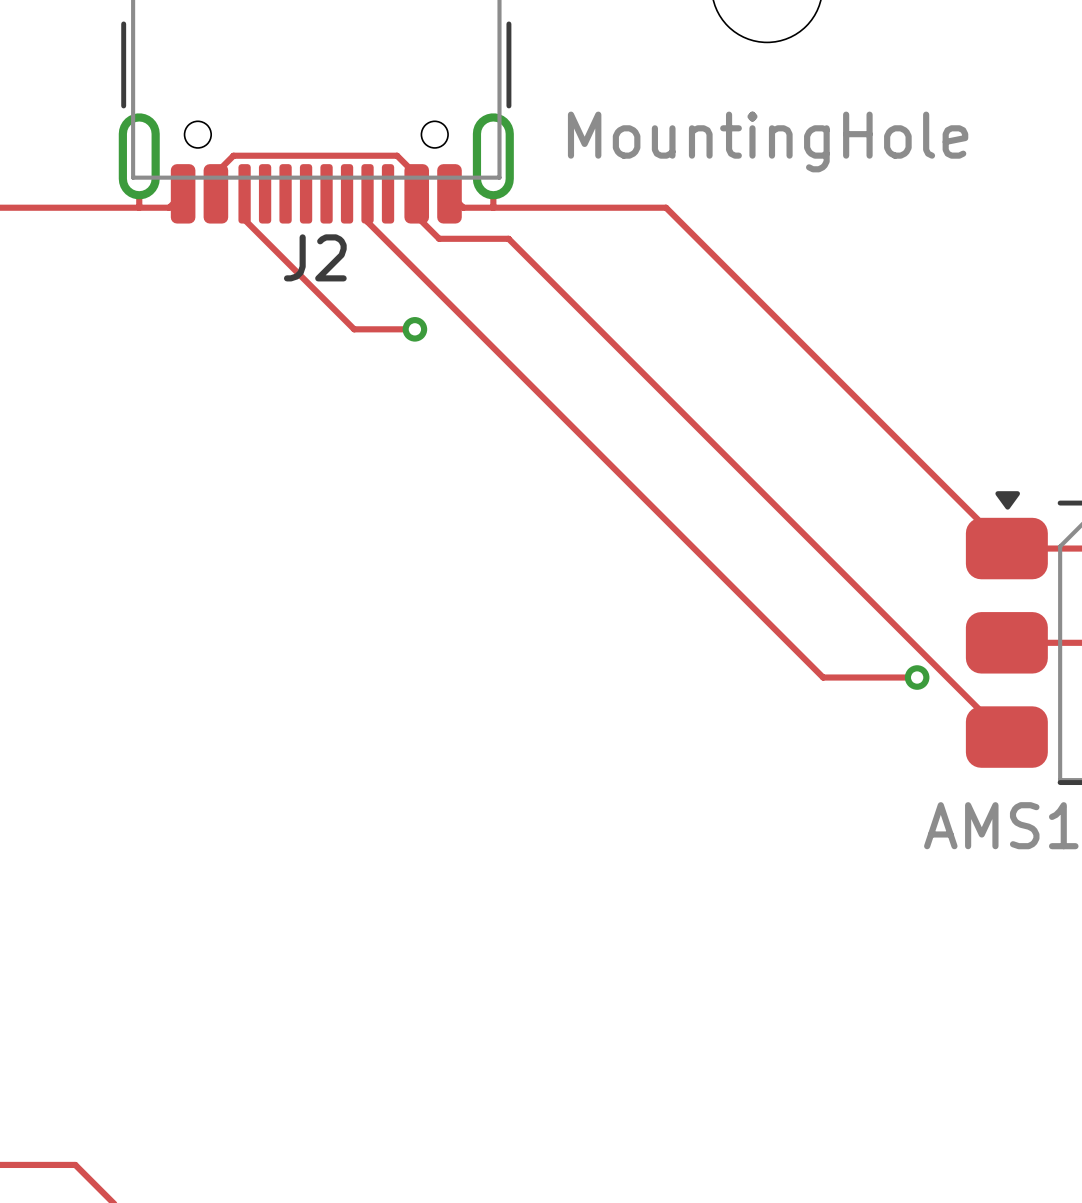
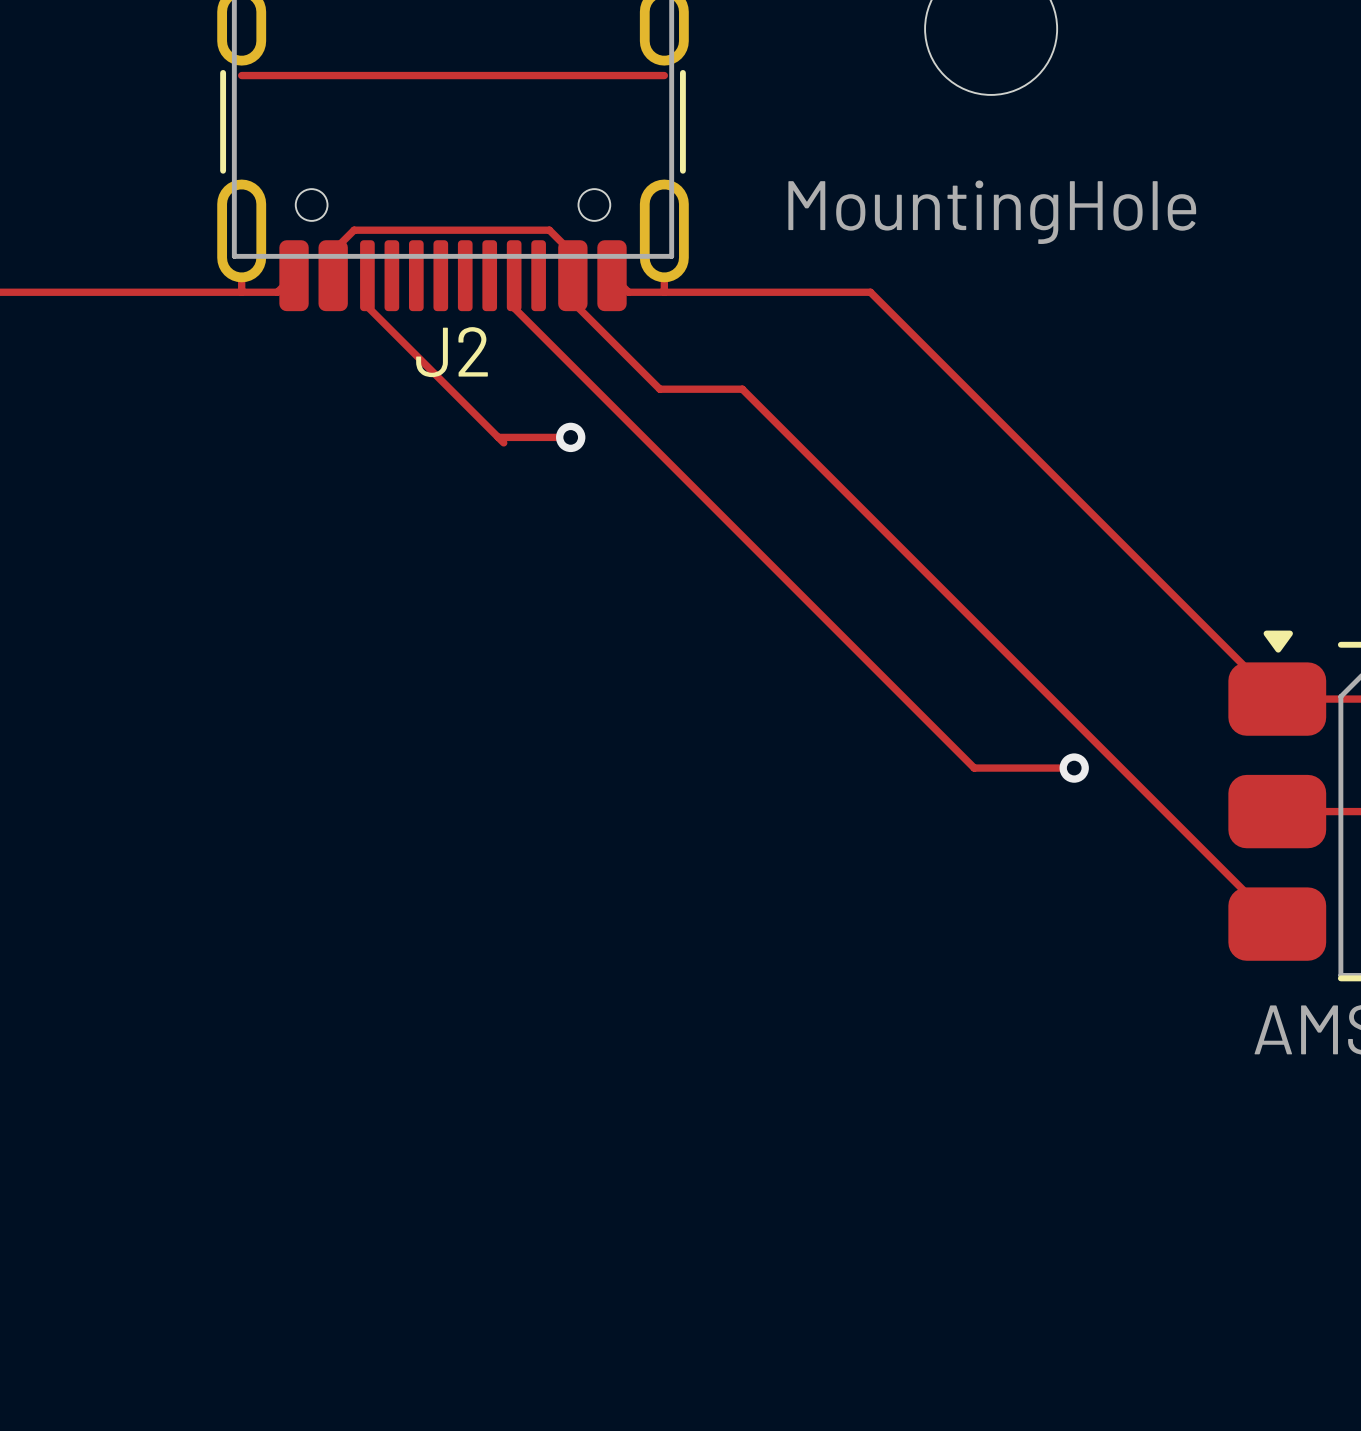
track: none -> (241, 75) (664, 75)
track: (416, 216) (439, 238) (508, 238) (558, 288) -> (572, 302) (659, 389) (742, 389)
track: (367, 220) (823, 677) (917, 677) -> (514, 307) (974, 768) (1074, 768)
via position: (917, 677) -> (1074, 768)

